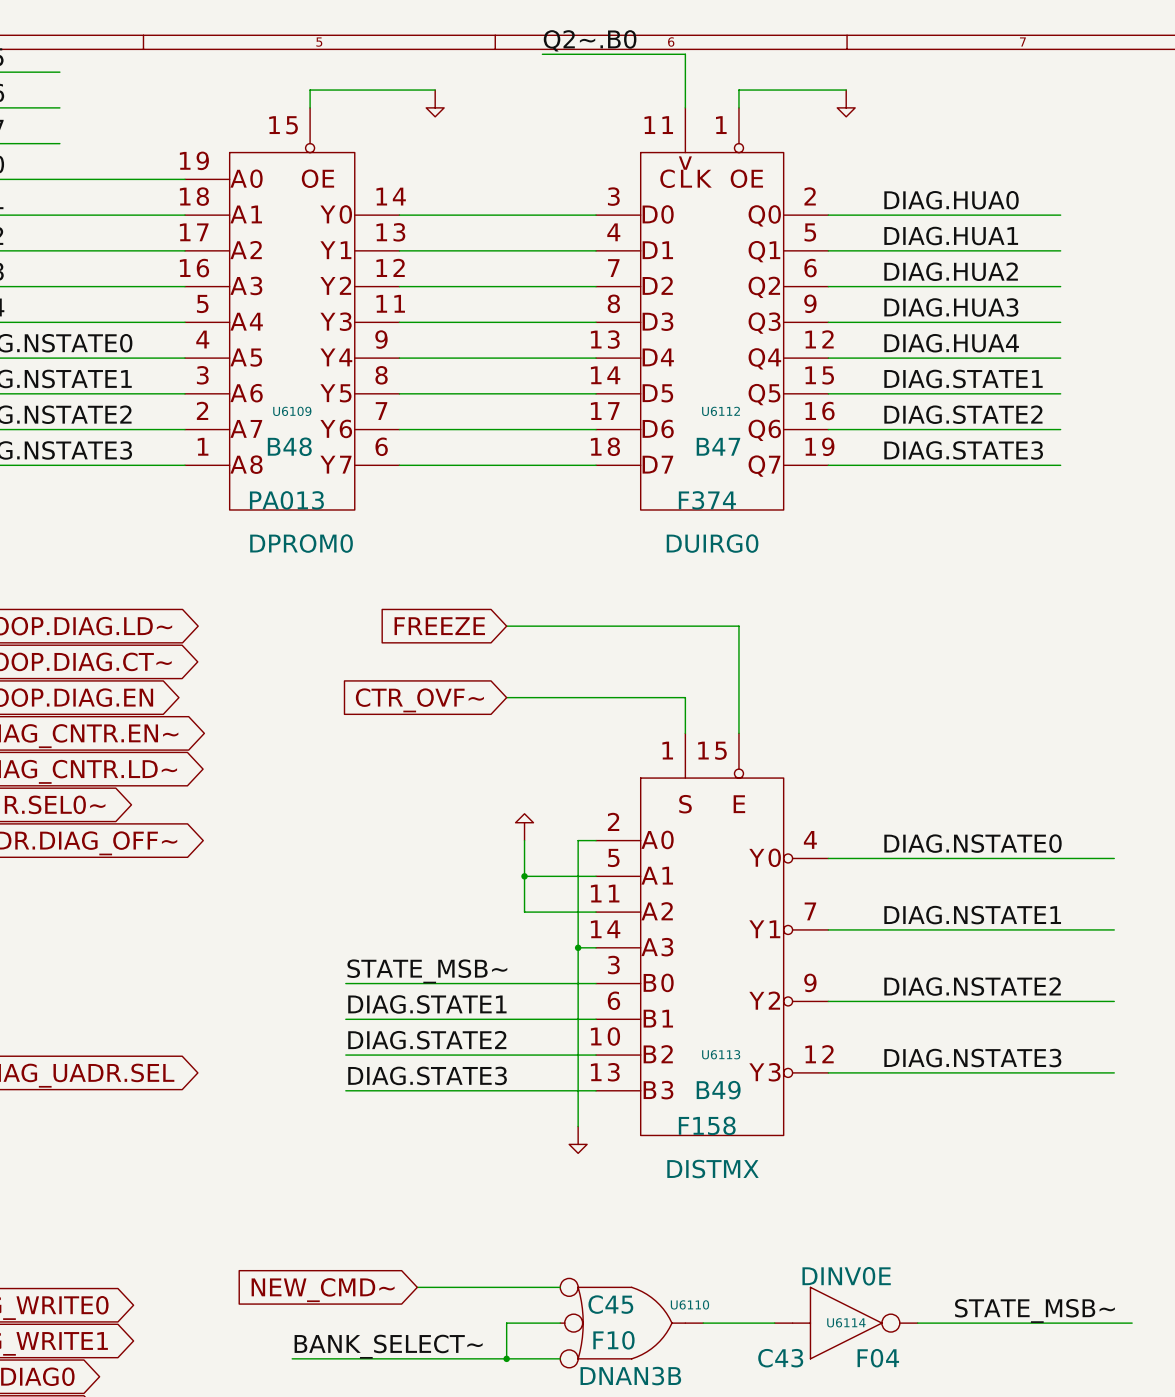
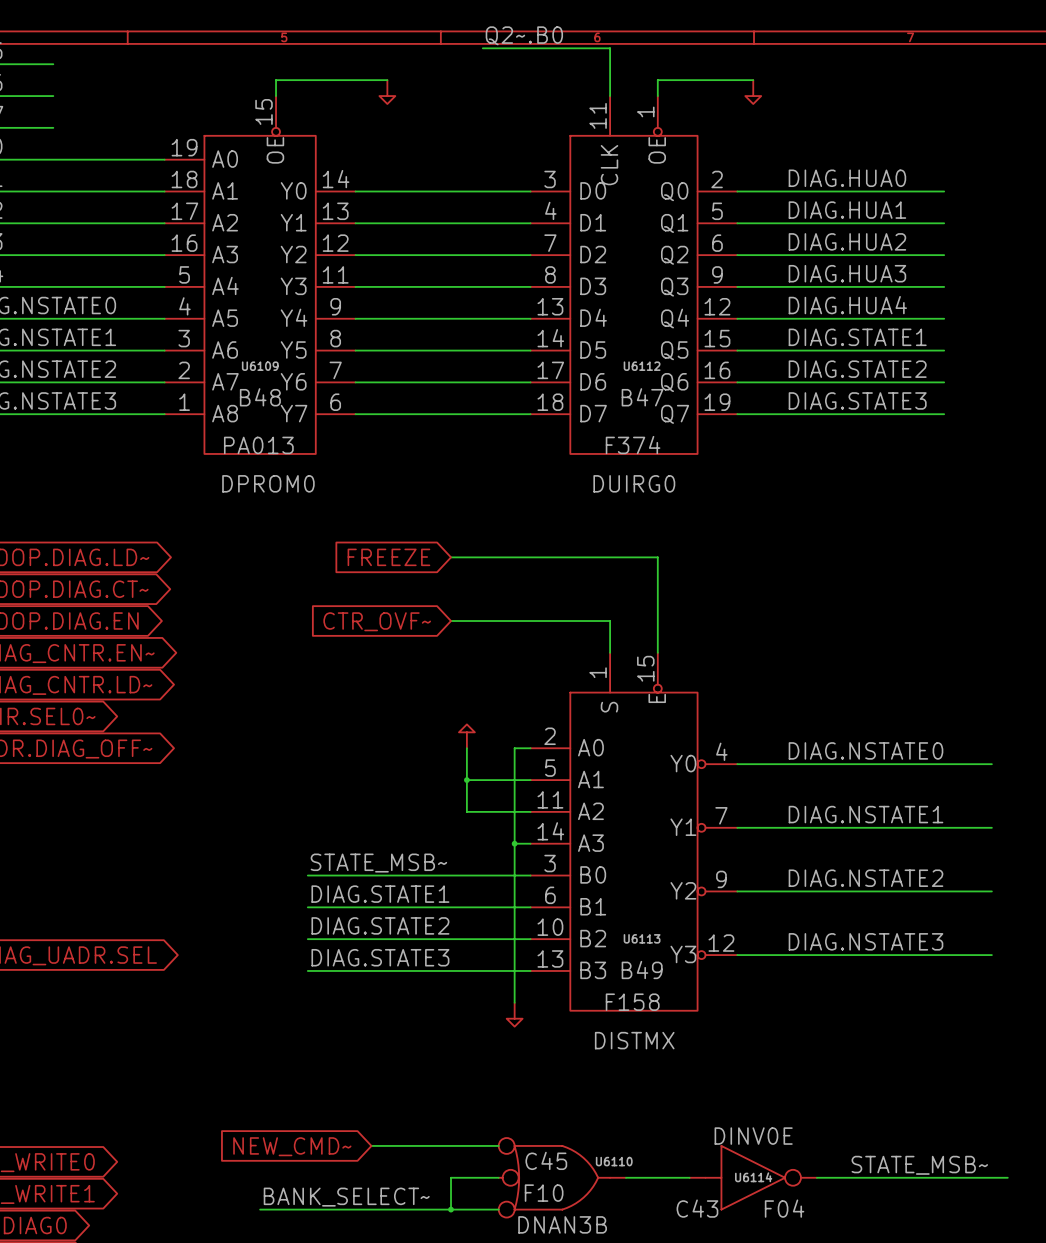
U6109 symbol: [184, 107, 400, 510] -> [164, 96, 356, 454]
U6112 symbol: [596, 107, 829, 510] -> [530, 96, 738, 454]
U6113 symbol: [596, 733, 829, 1136] -> [530, 652, 738, 1011]

